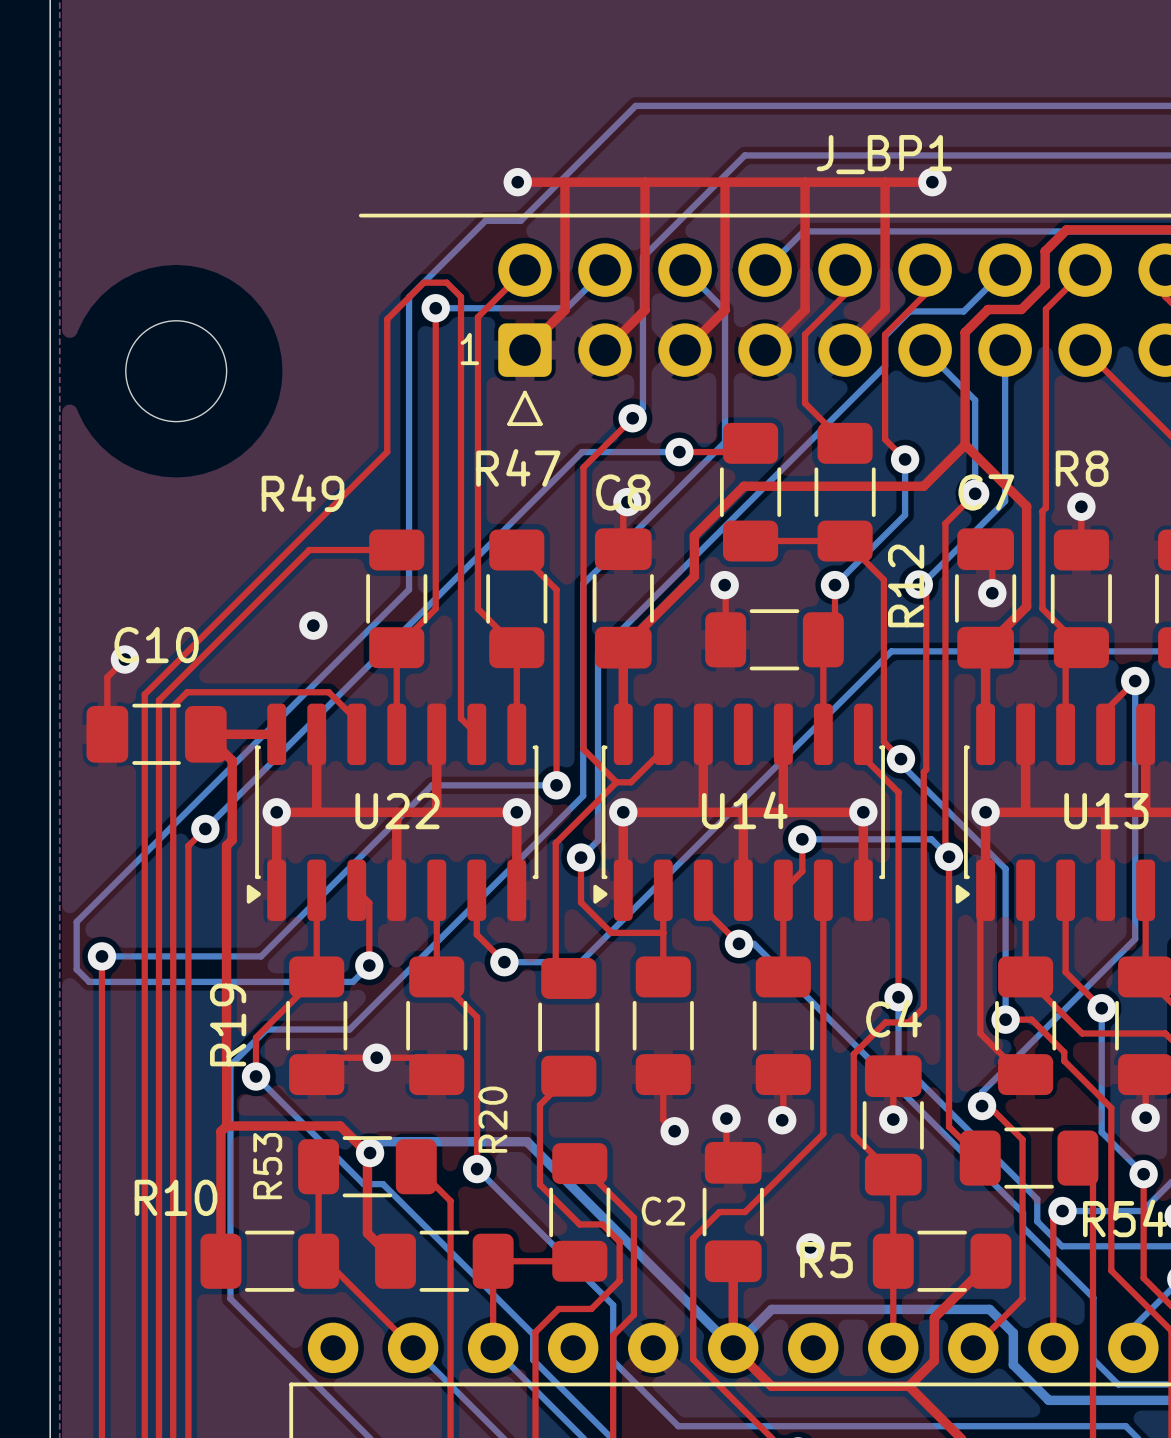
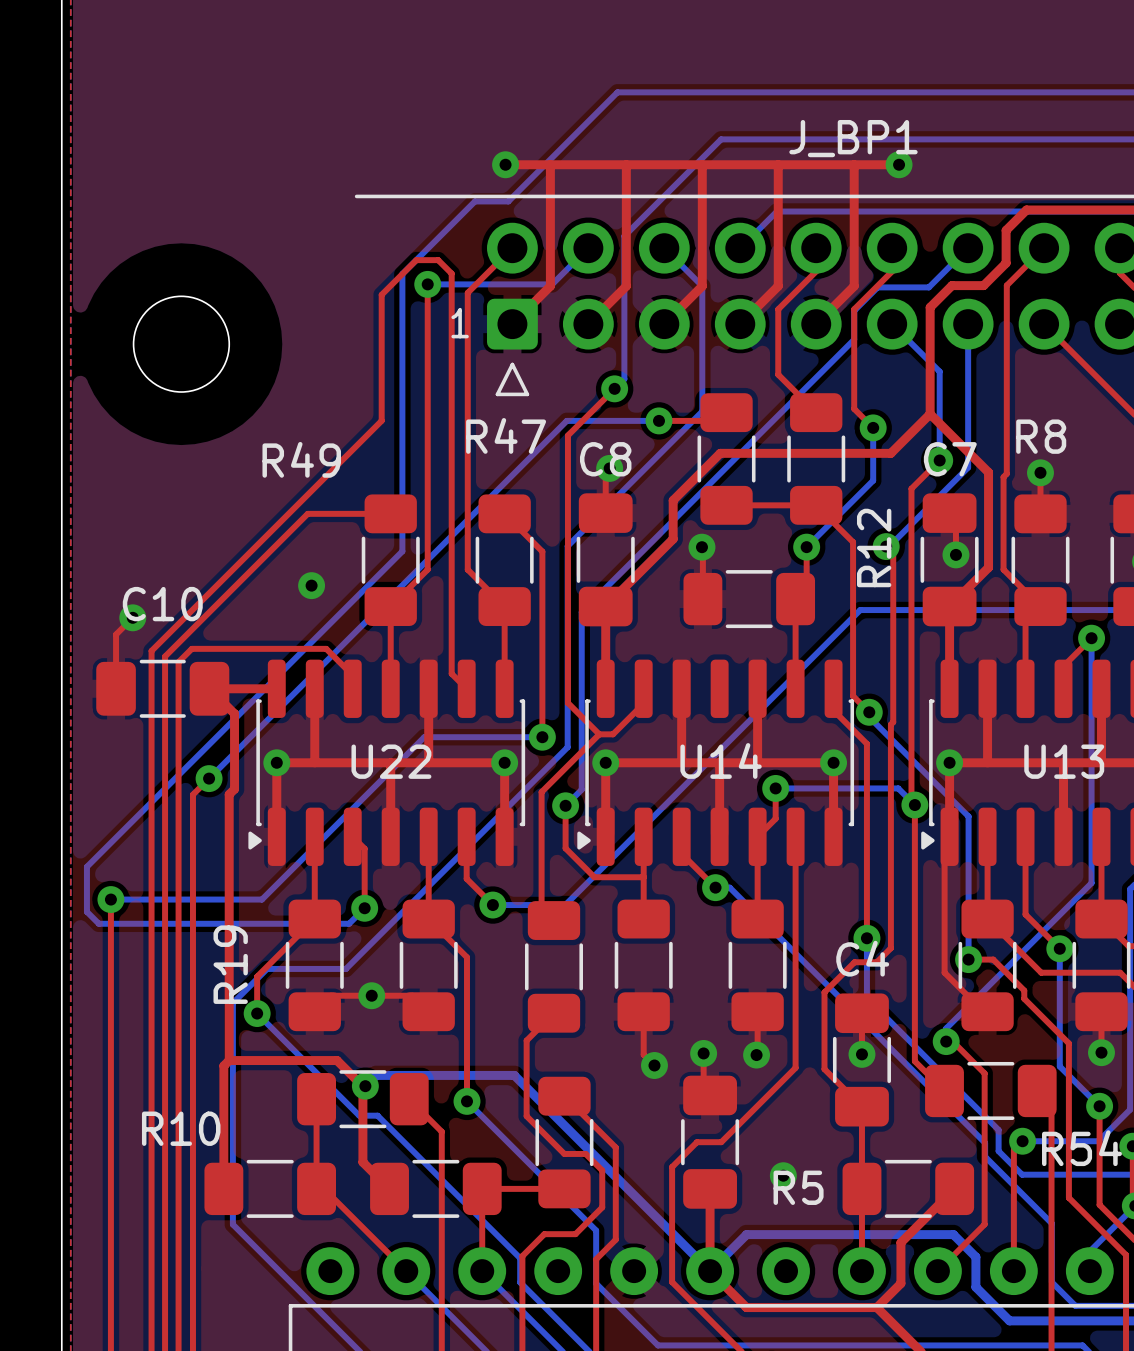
R20 name: R20 (493, 1119) -> none
R53 name: R53 (267, 1166) -> none
C2 name: C2 (663, 1211) -> none

